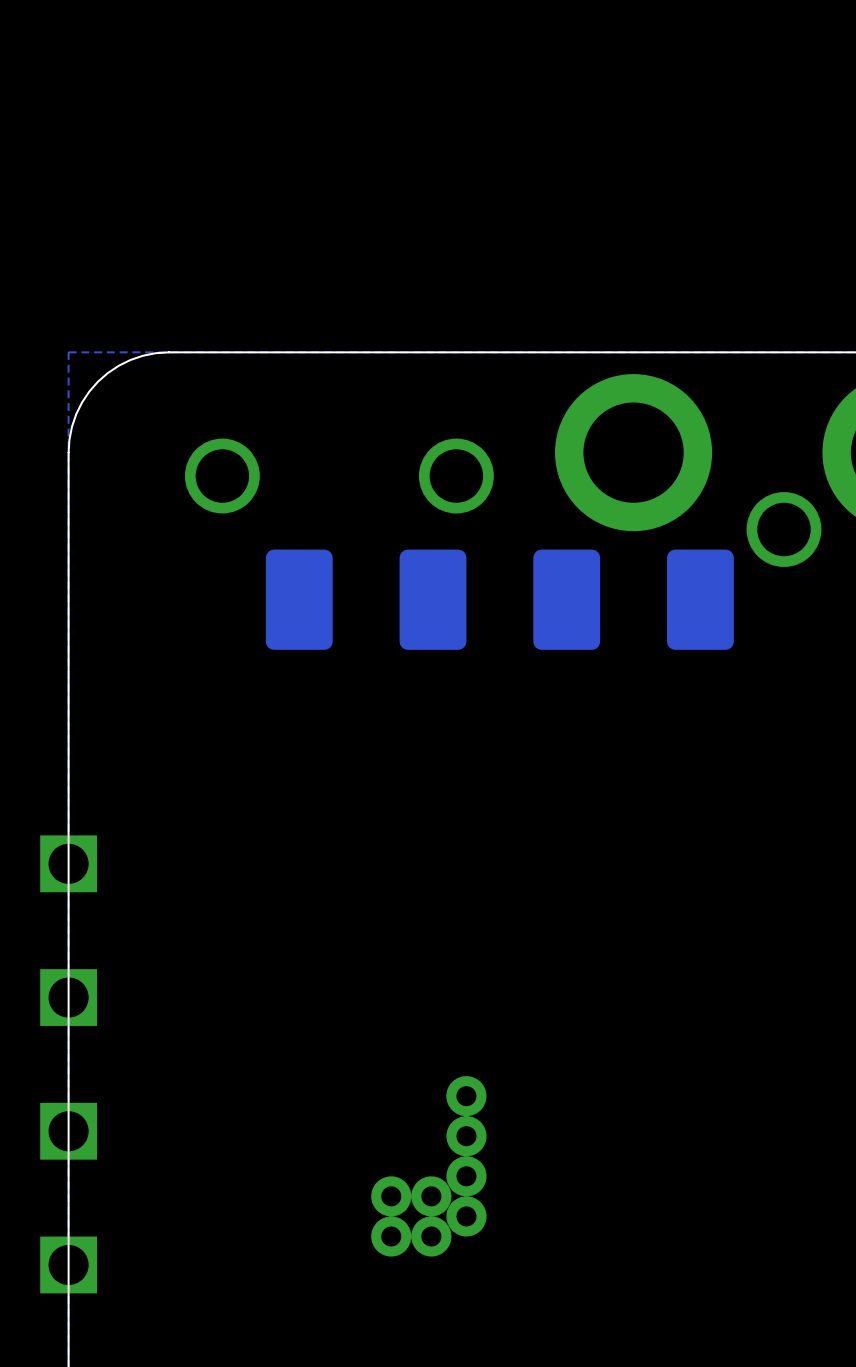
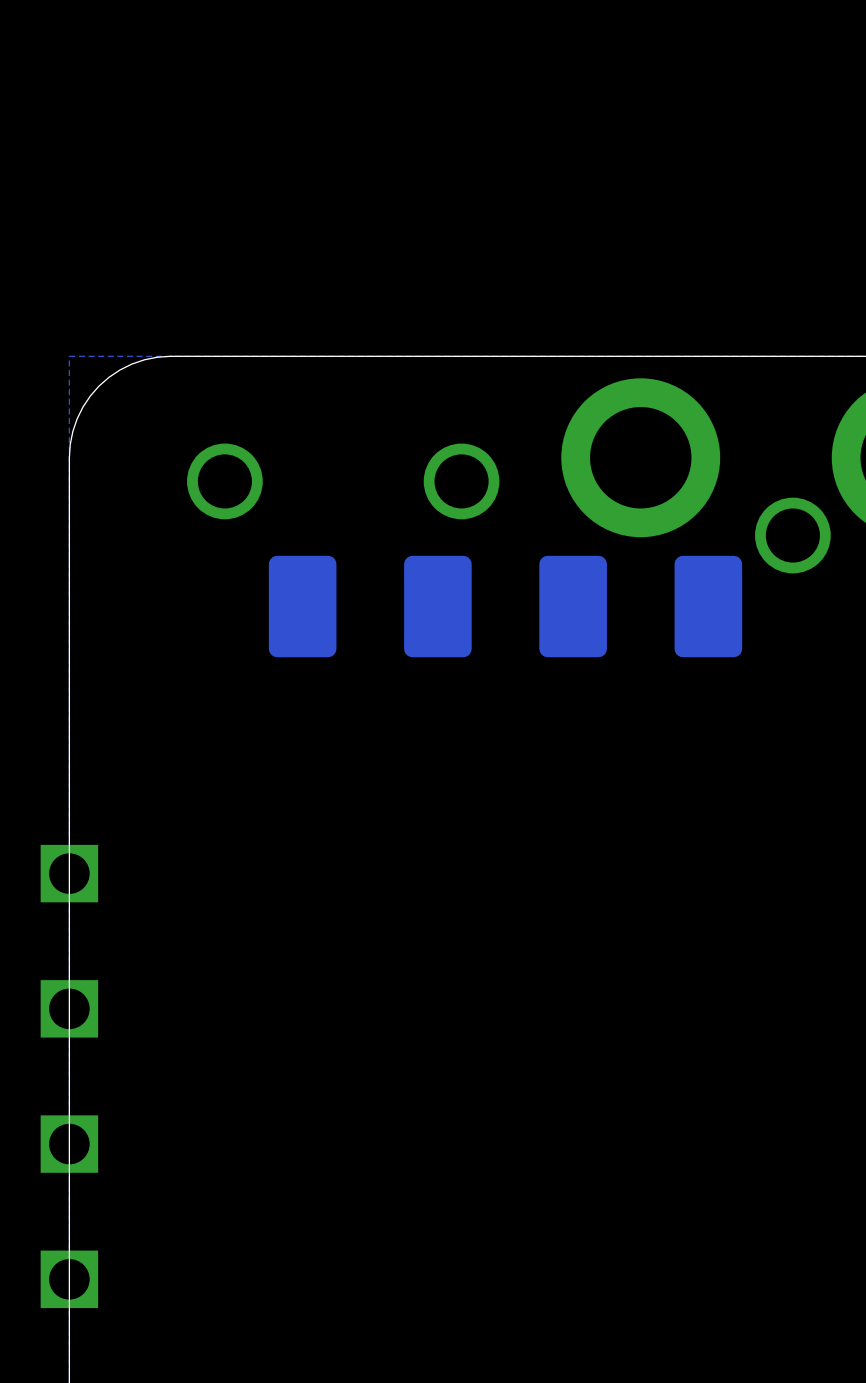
via: (466, 1096) -> none
via: (466, 1136) -> none
via: (466, 1176) -> none
via: (391, 1196) -> none
via: (431, 1196) -> none
via: (466, 1216) -> none
via: (391, 1236) -> none
via: (431, 1236) -> none

